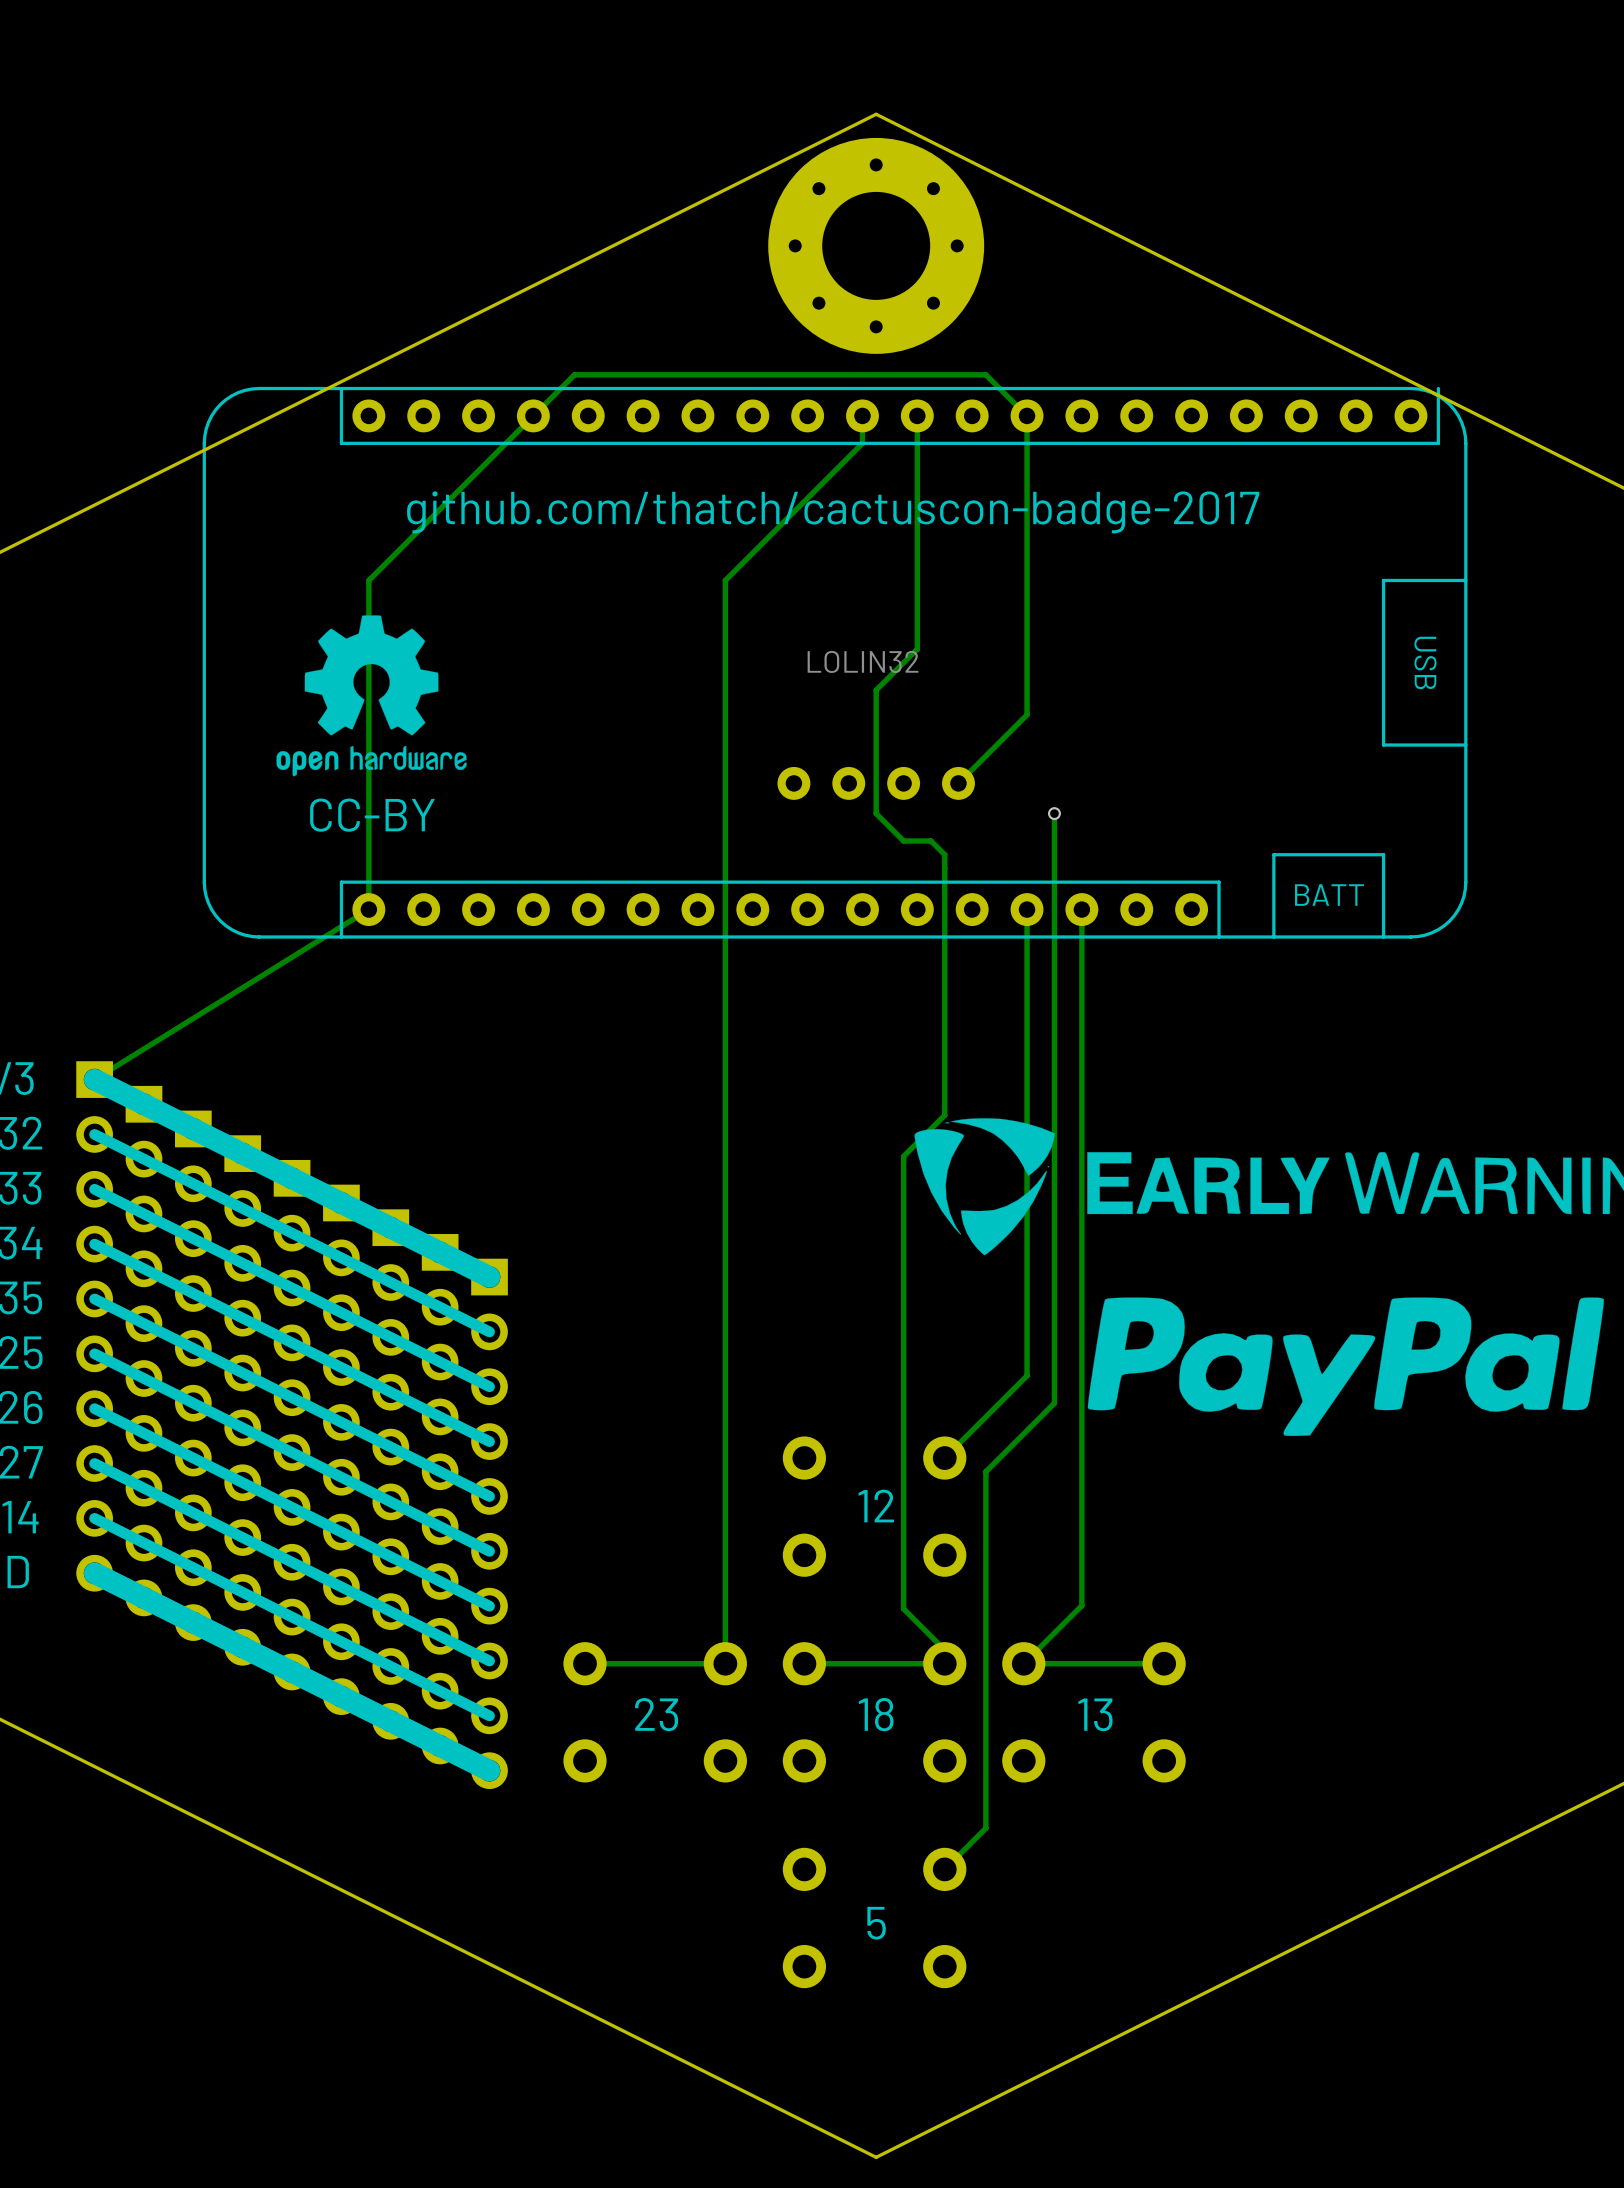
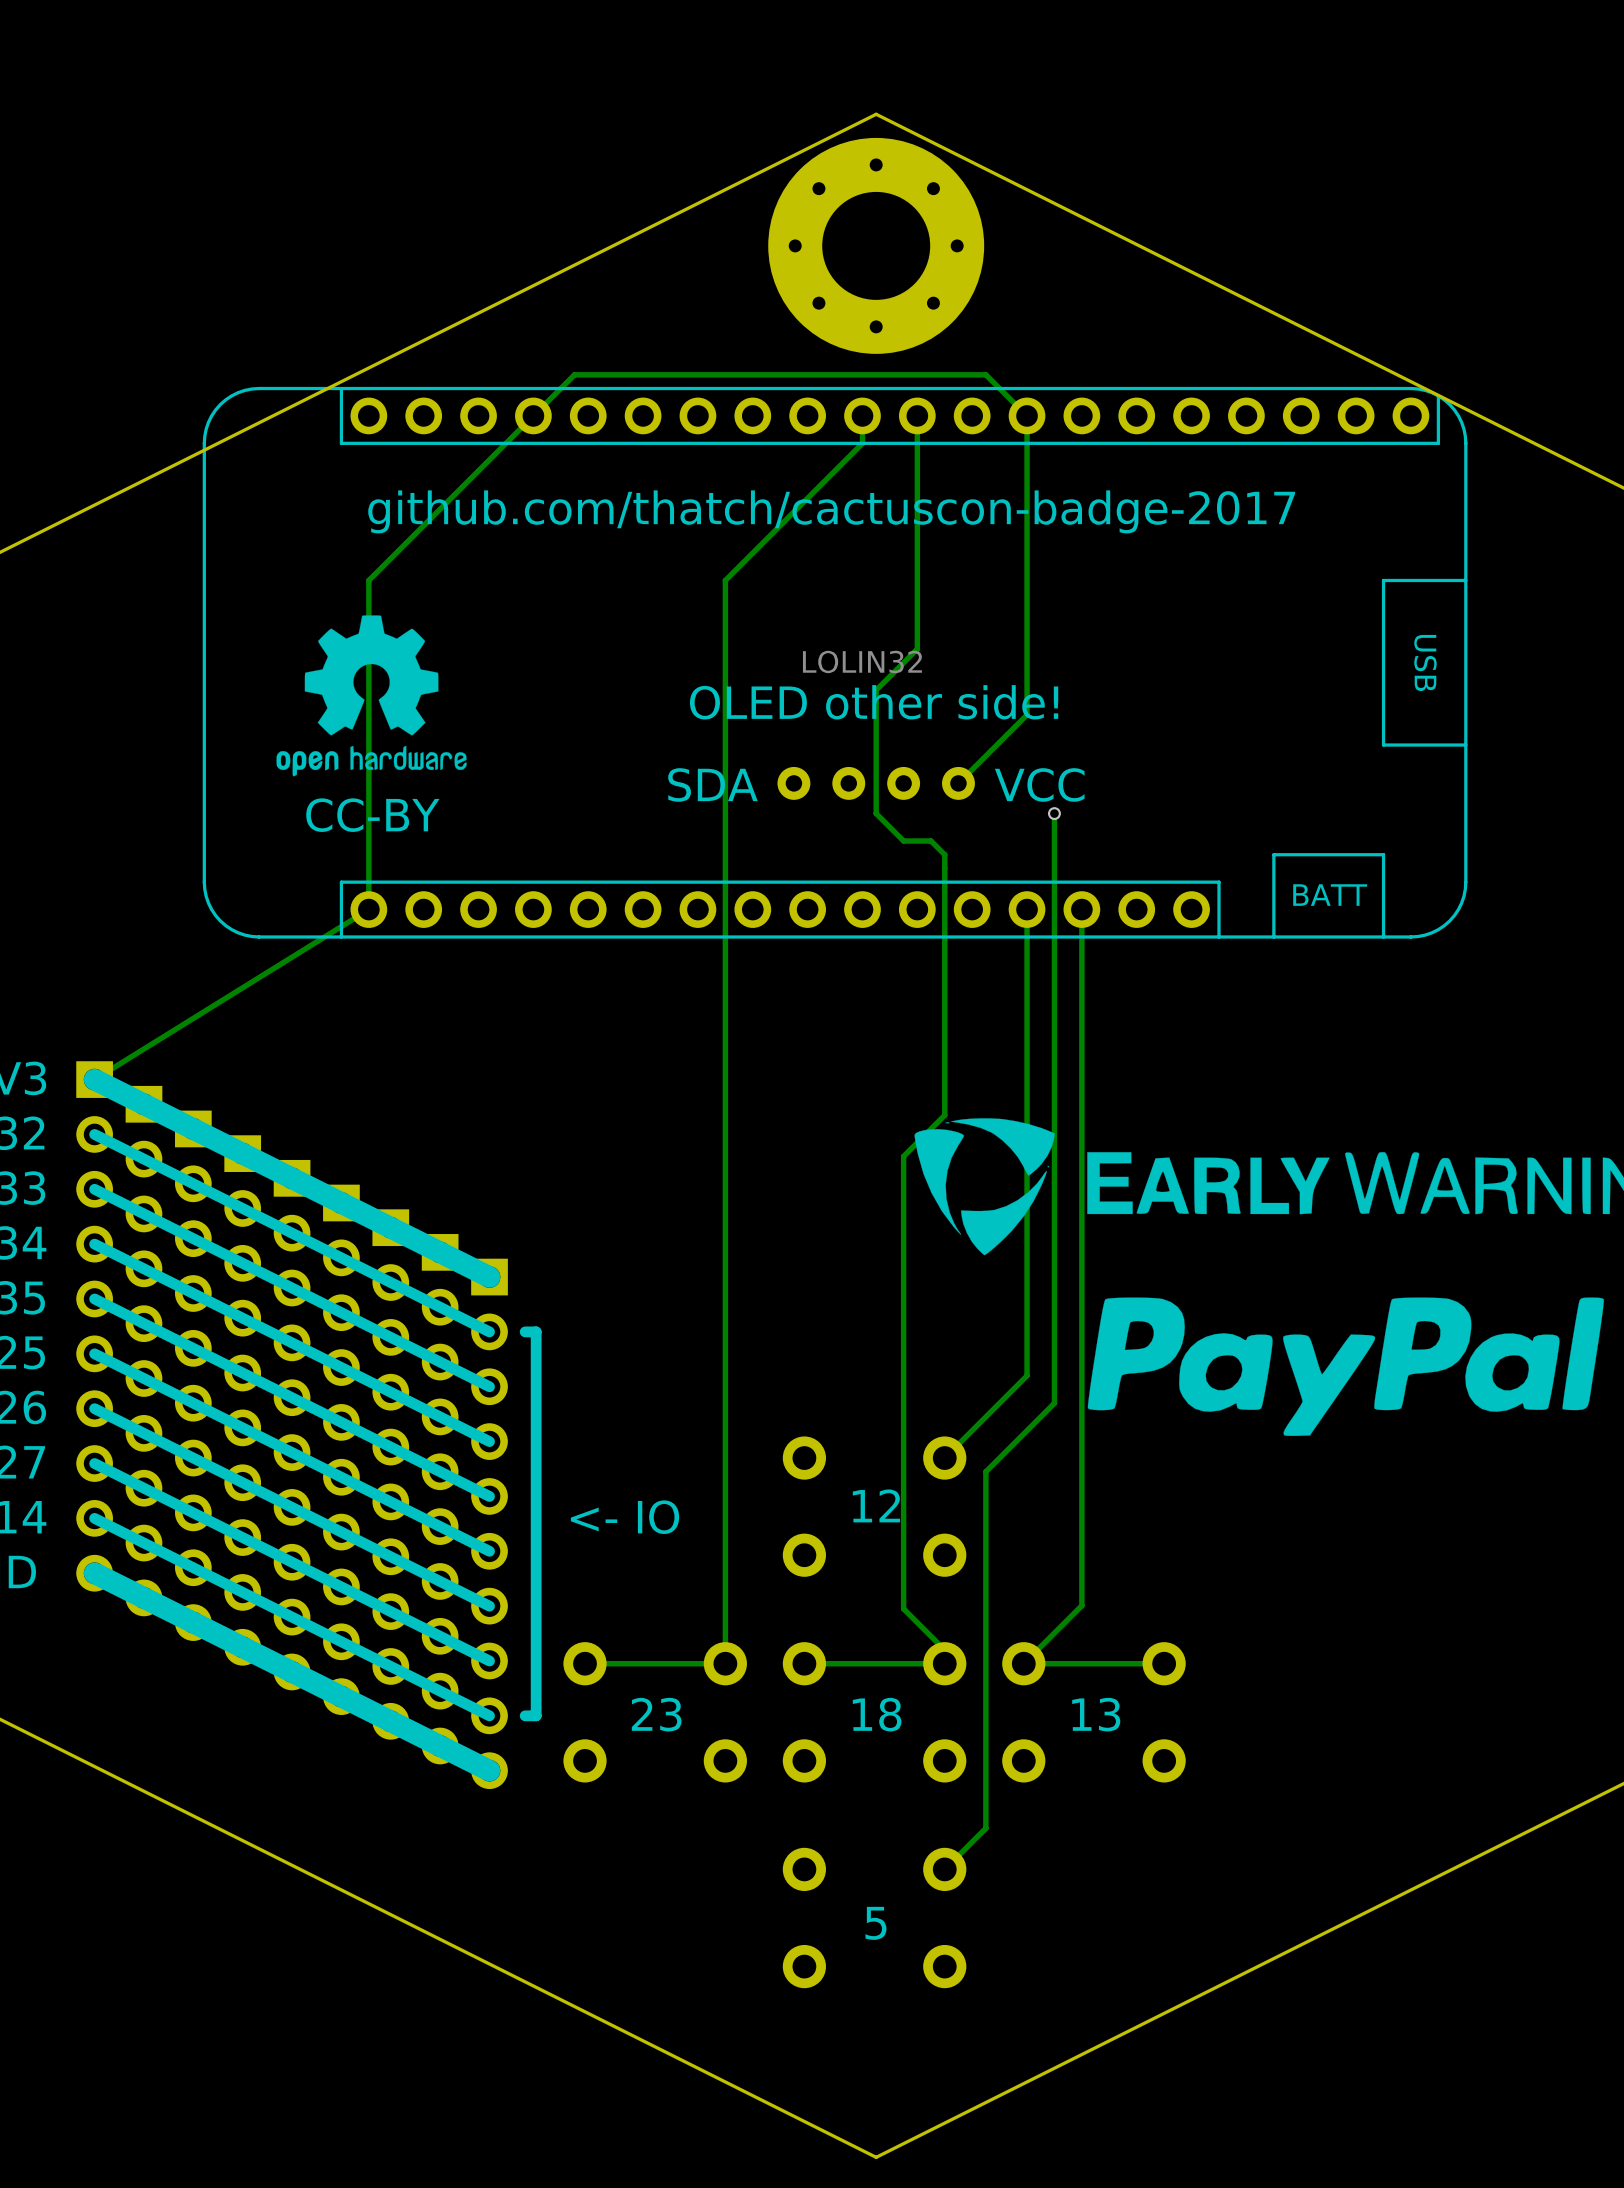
part footprint: [202, 386, 1468, 939] -> [202, 386, 1468, 939]
text: none -> OLED other side! (874, 702)
text: none -> SDA (712, 784)
text: none -> VCC (1039, 784)
line: none -> (525, 1331) (536, 1331) (536, 1715) (525, 1715)
text: none -> <- IO (625, 1517)

